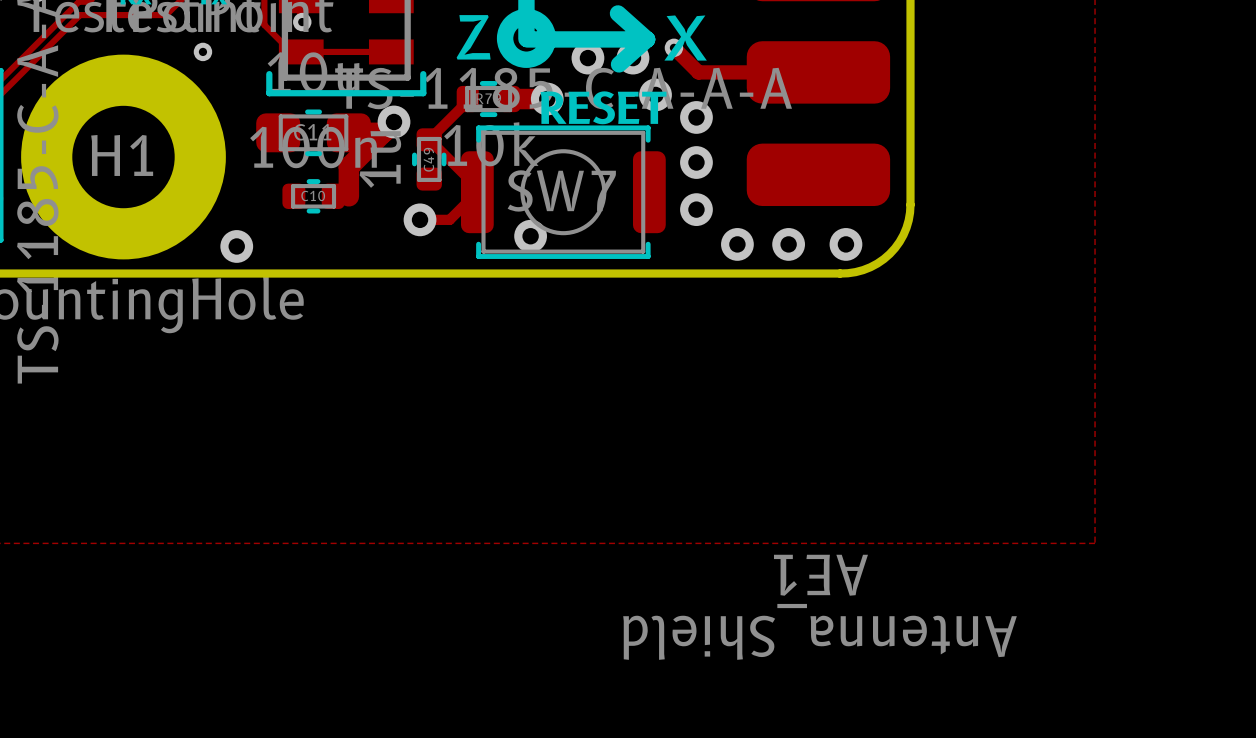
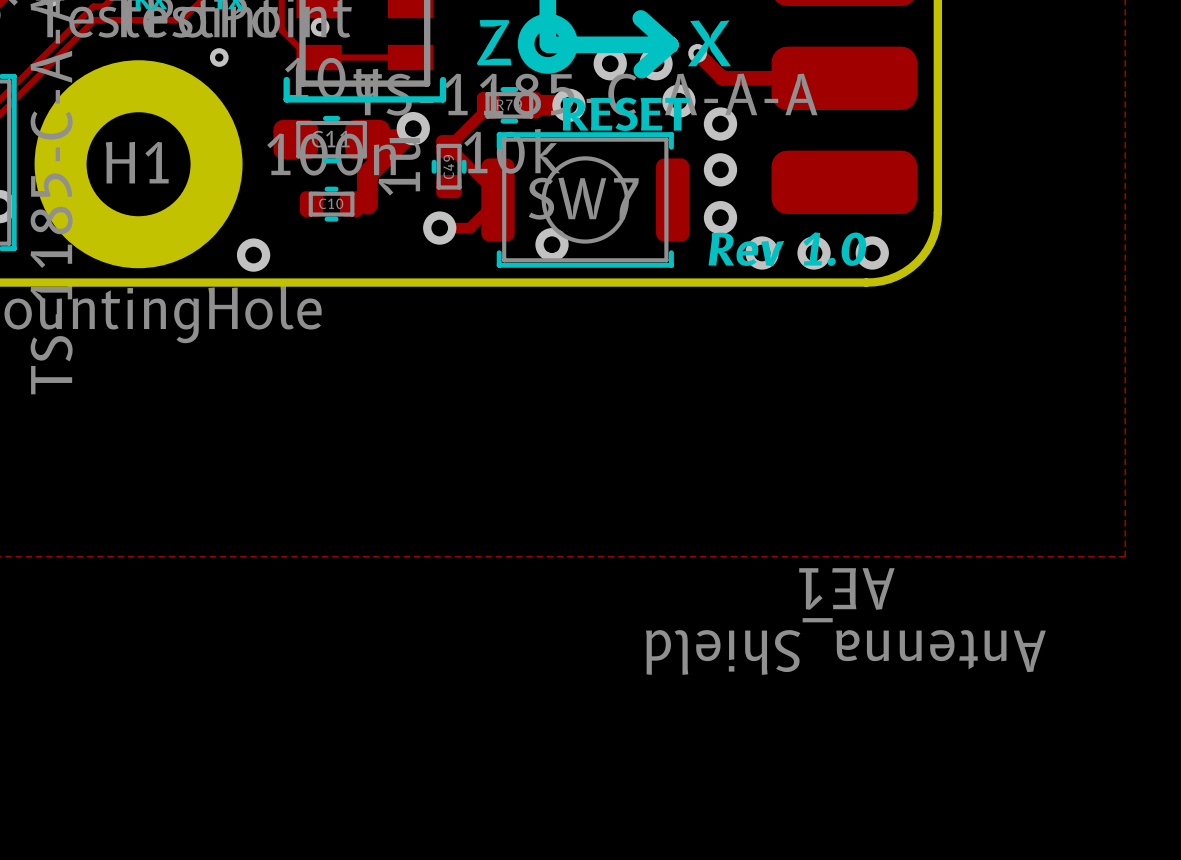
text: none -> Rev 1.0 (787, 249)

